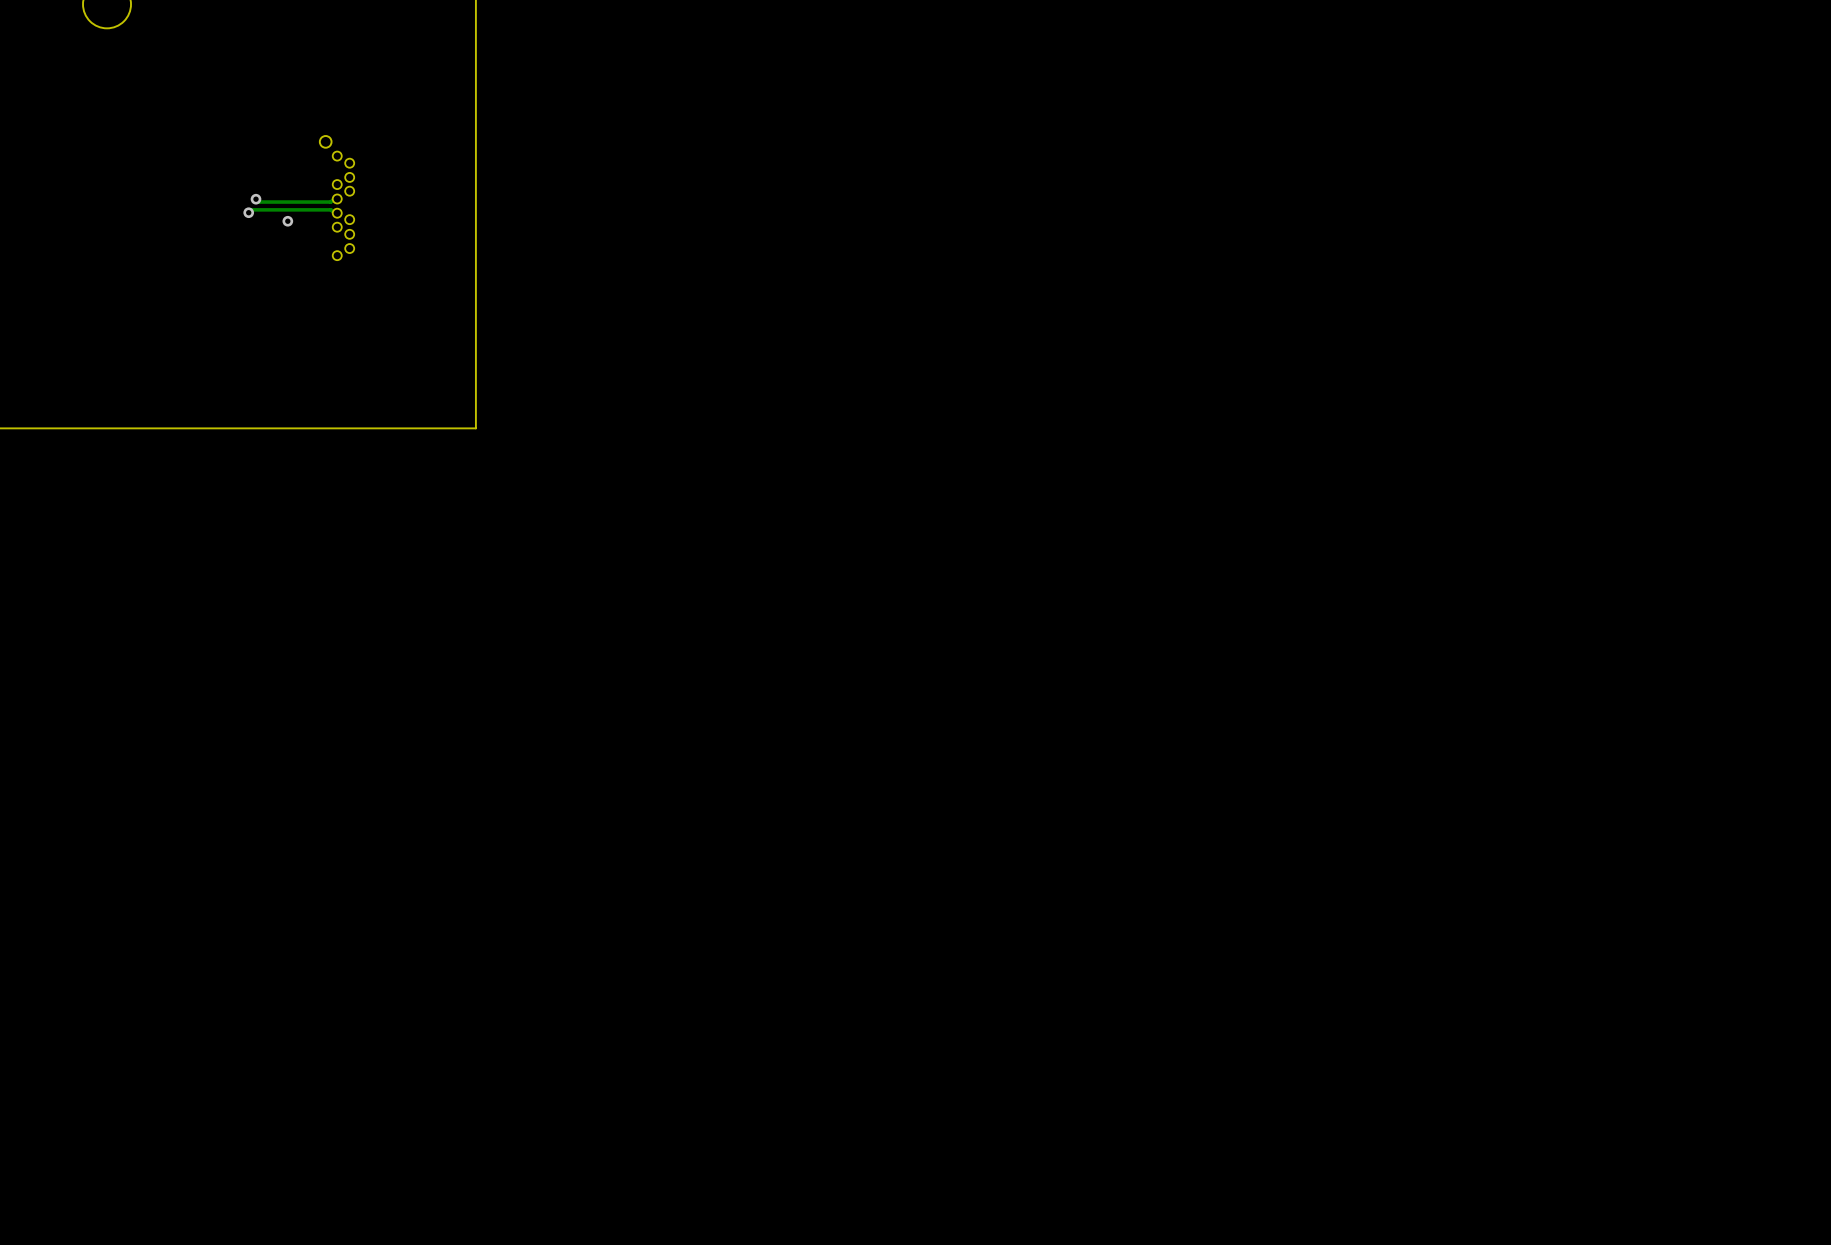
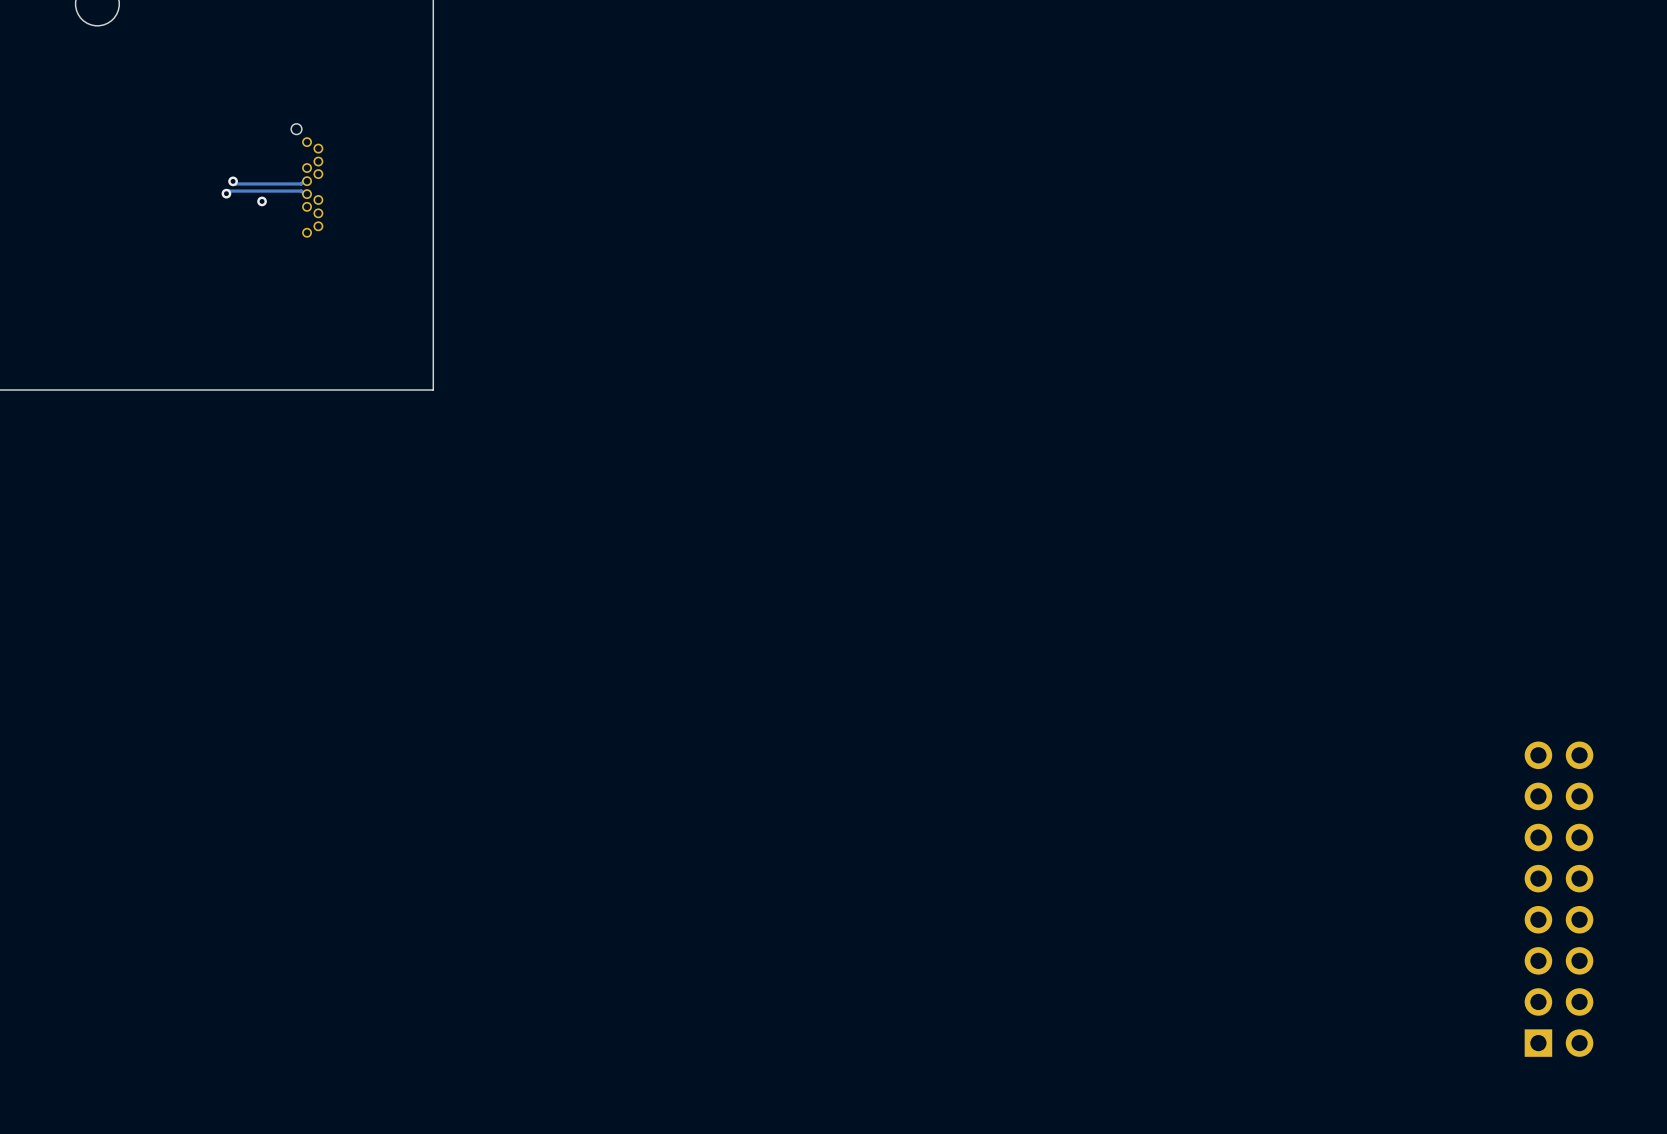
part: none -> (1558, 899)

